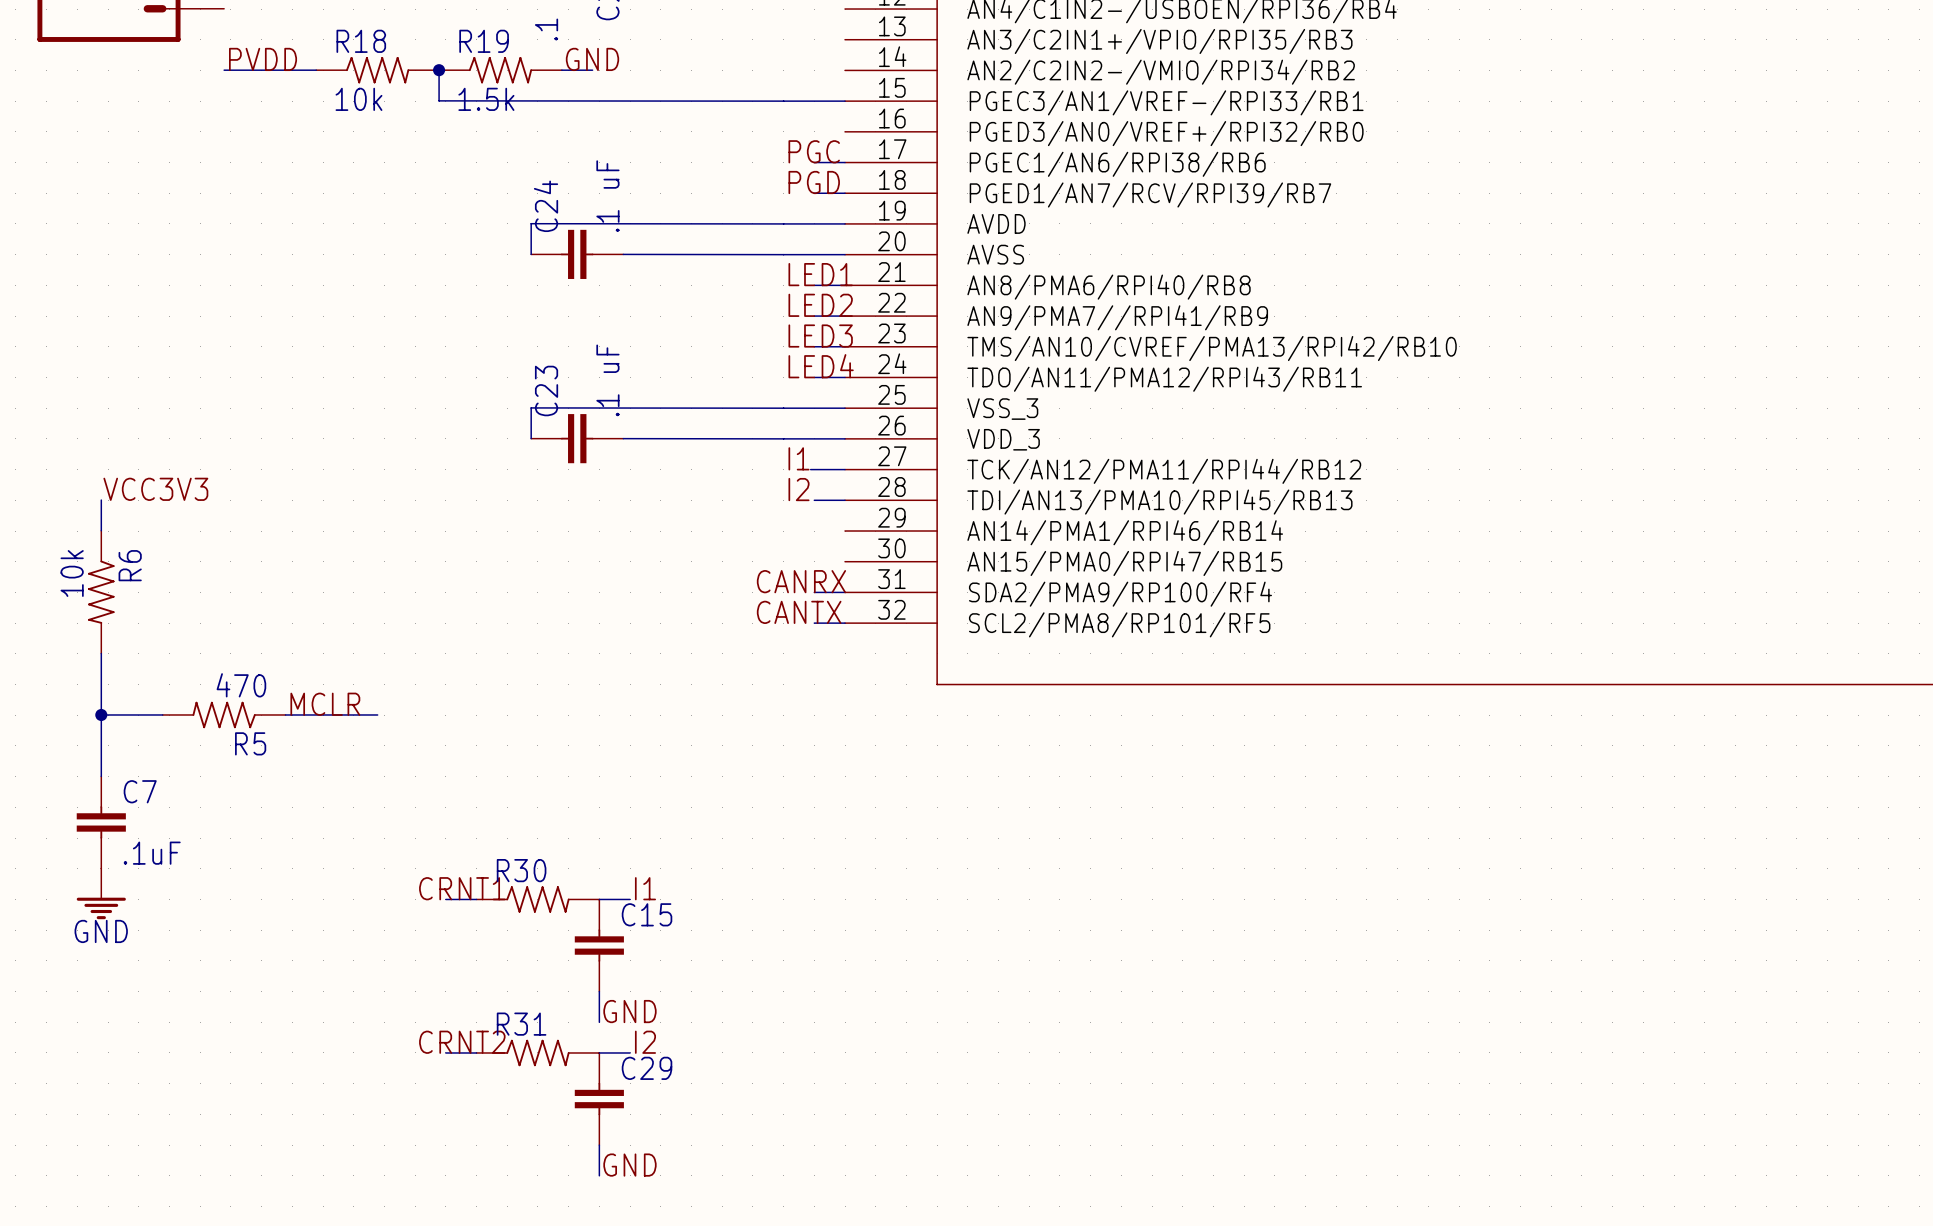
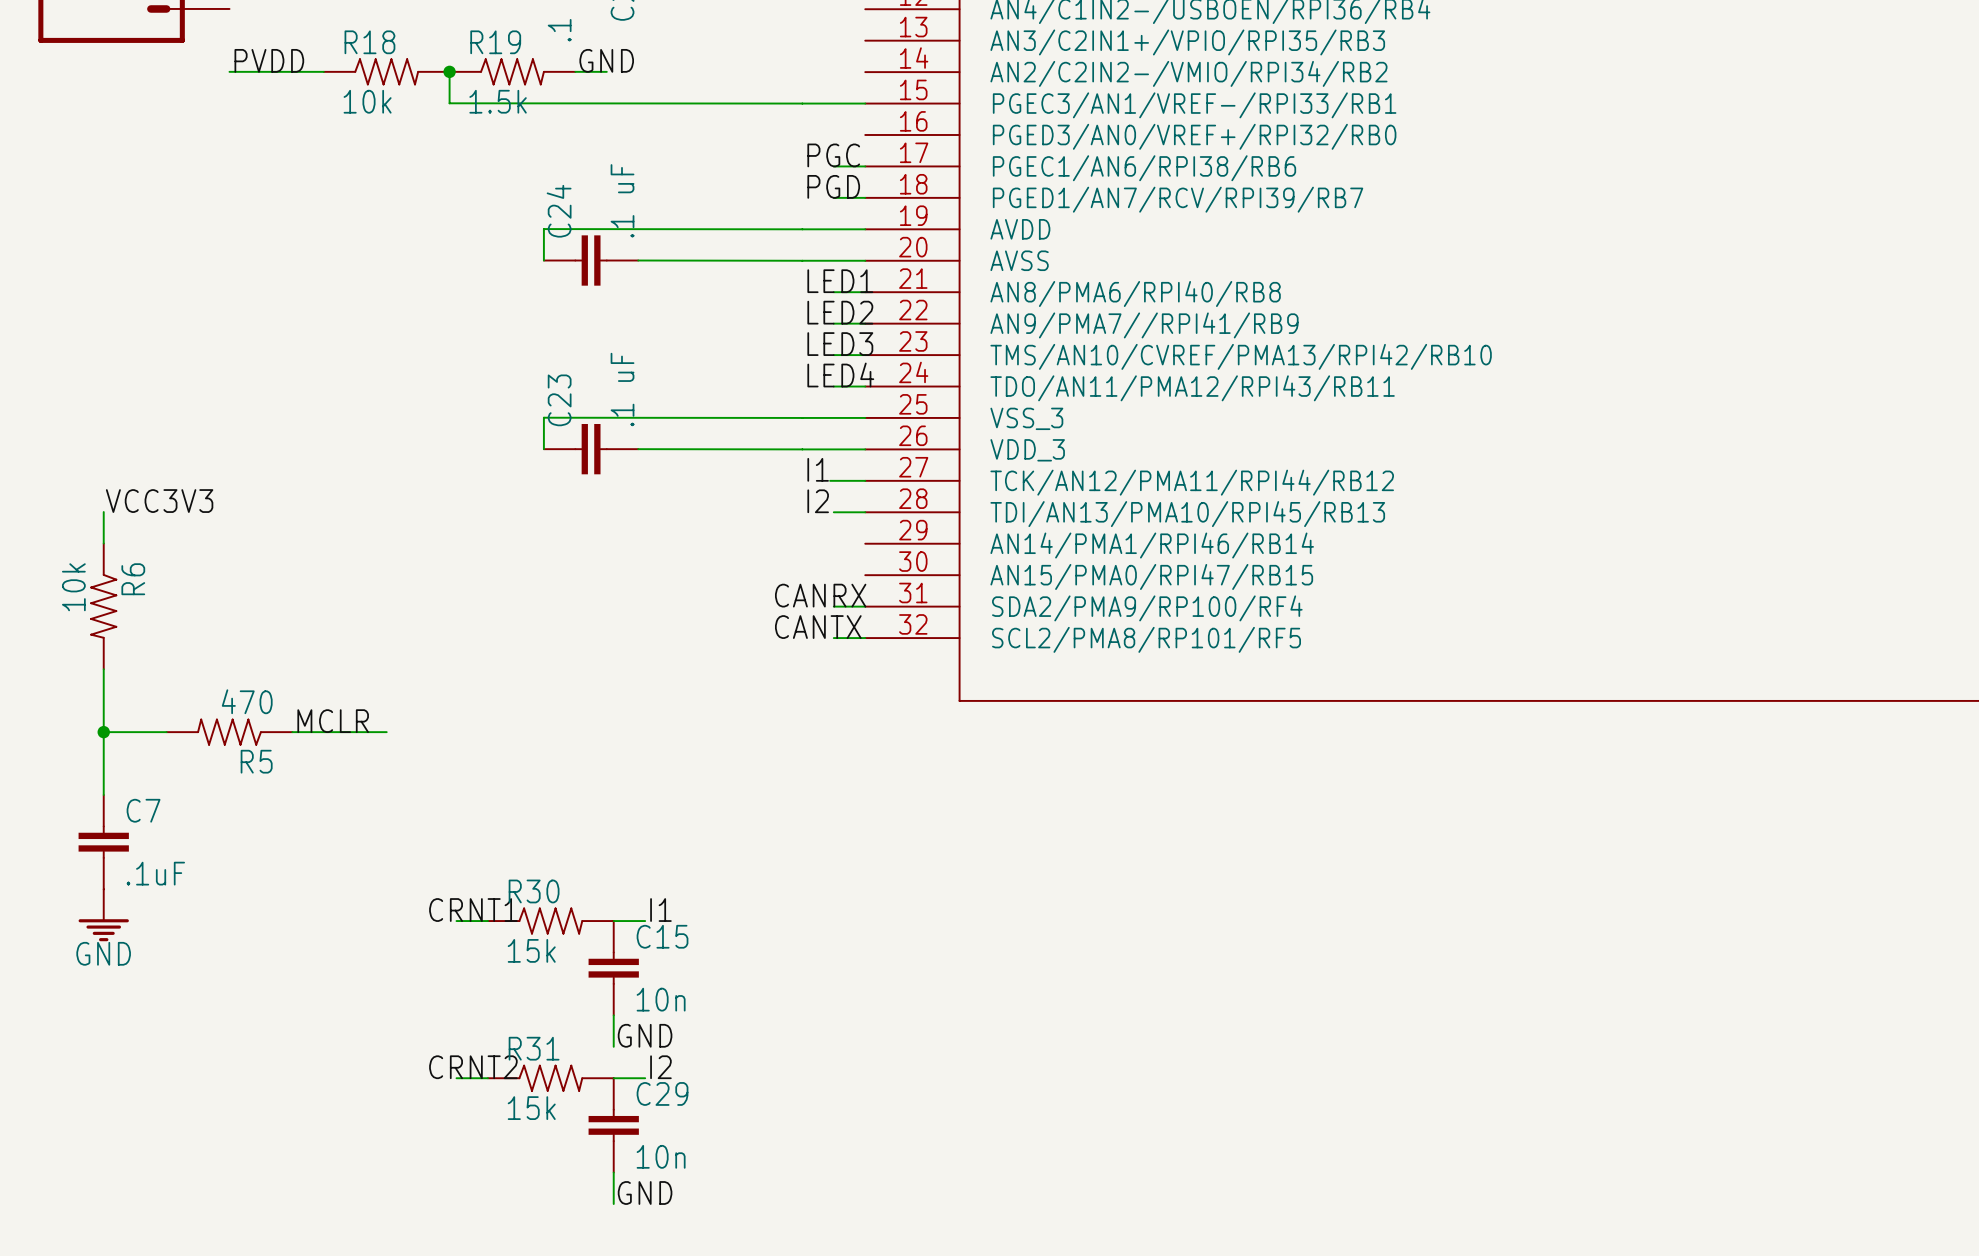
R30 value: none -> 15k (531, 950)
C15 value: none -> 10n (661, 999)
R31 value: none -> 15k (531, 1108)
C29 value: none -> 10n (661, 1156)

